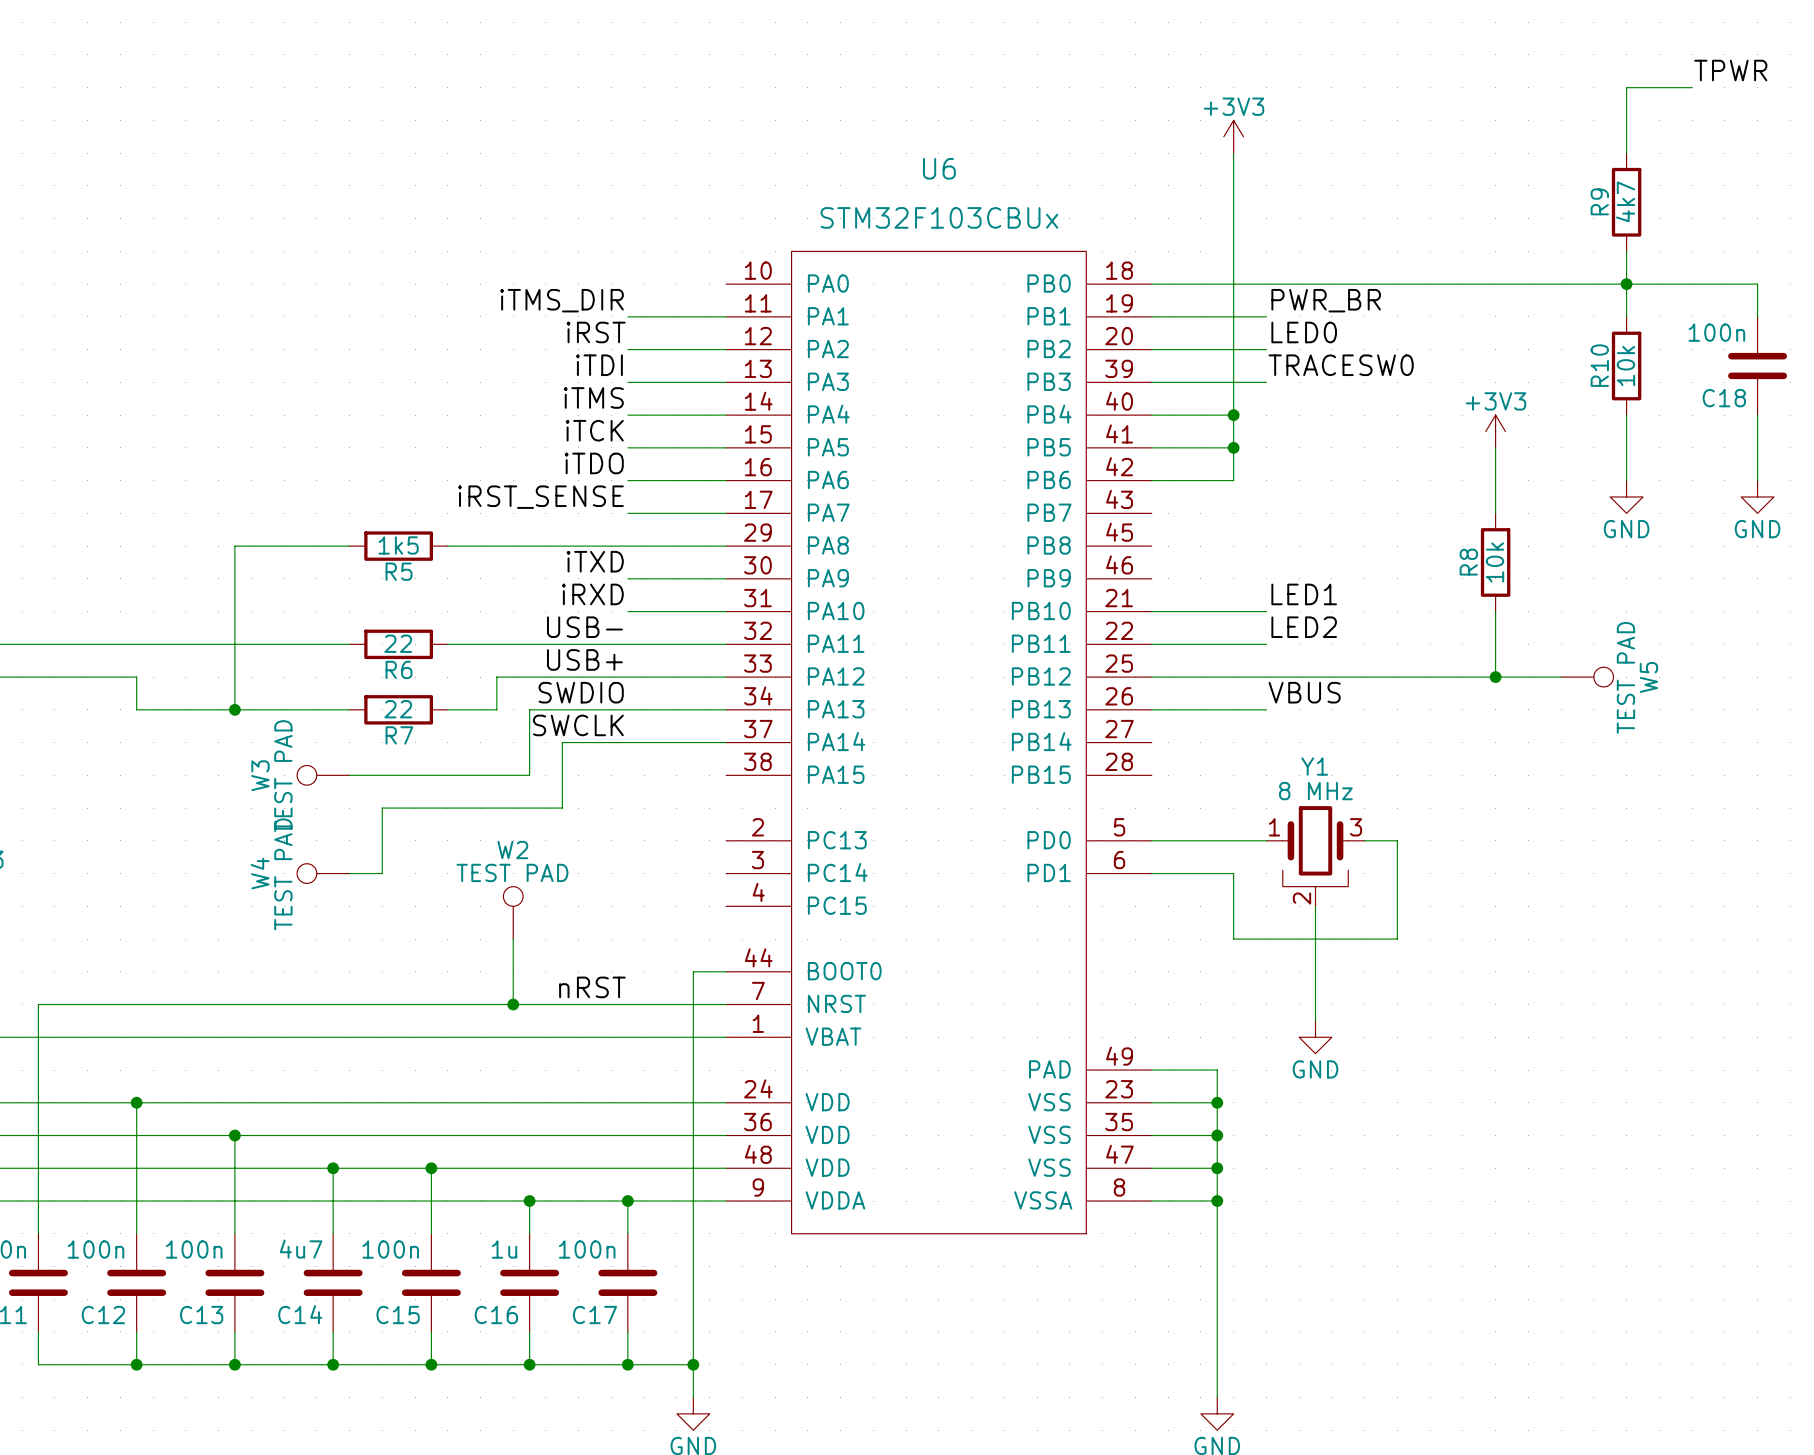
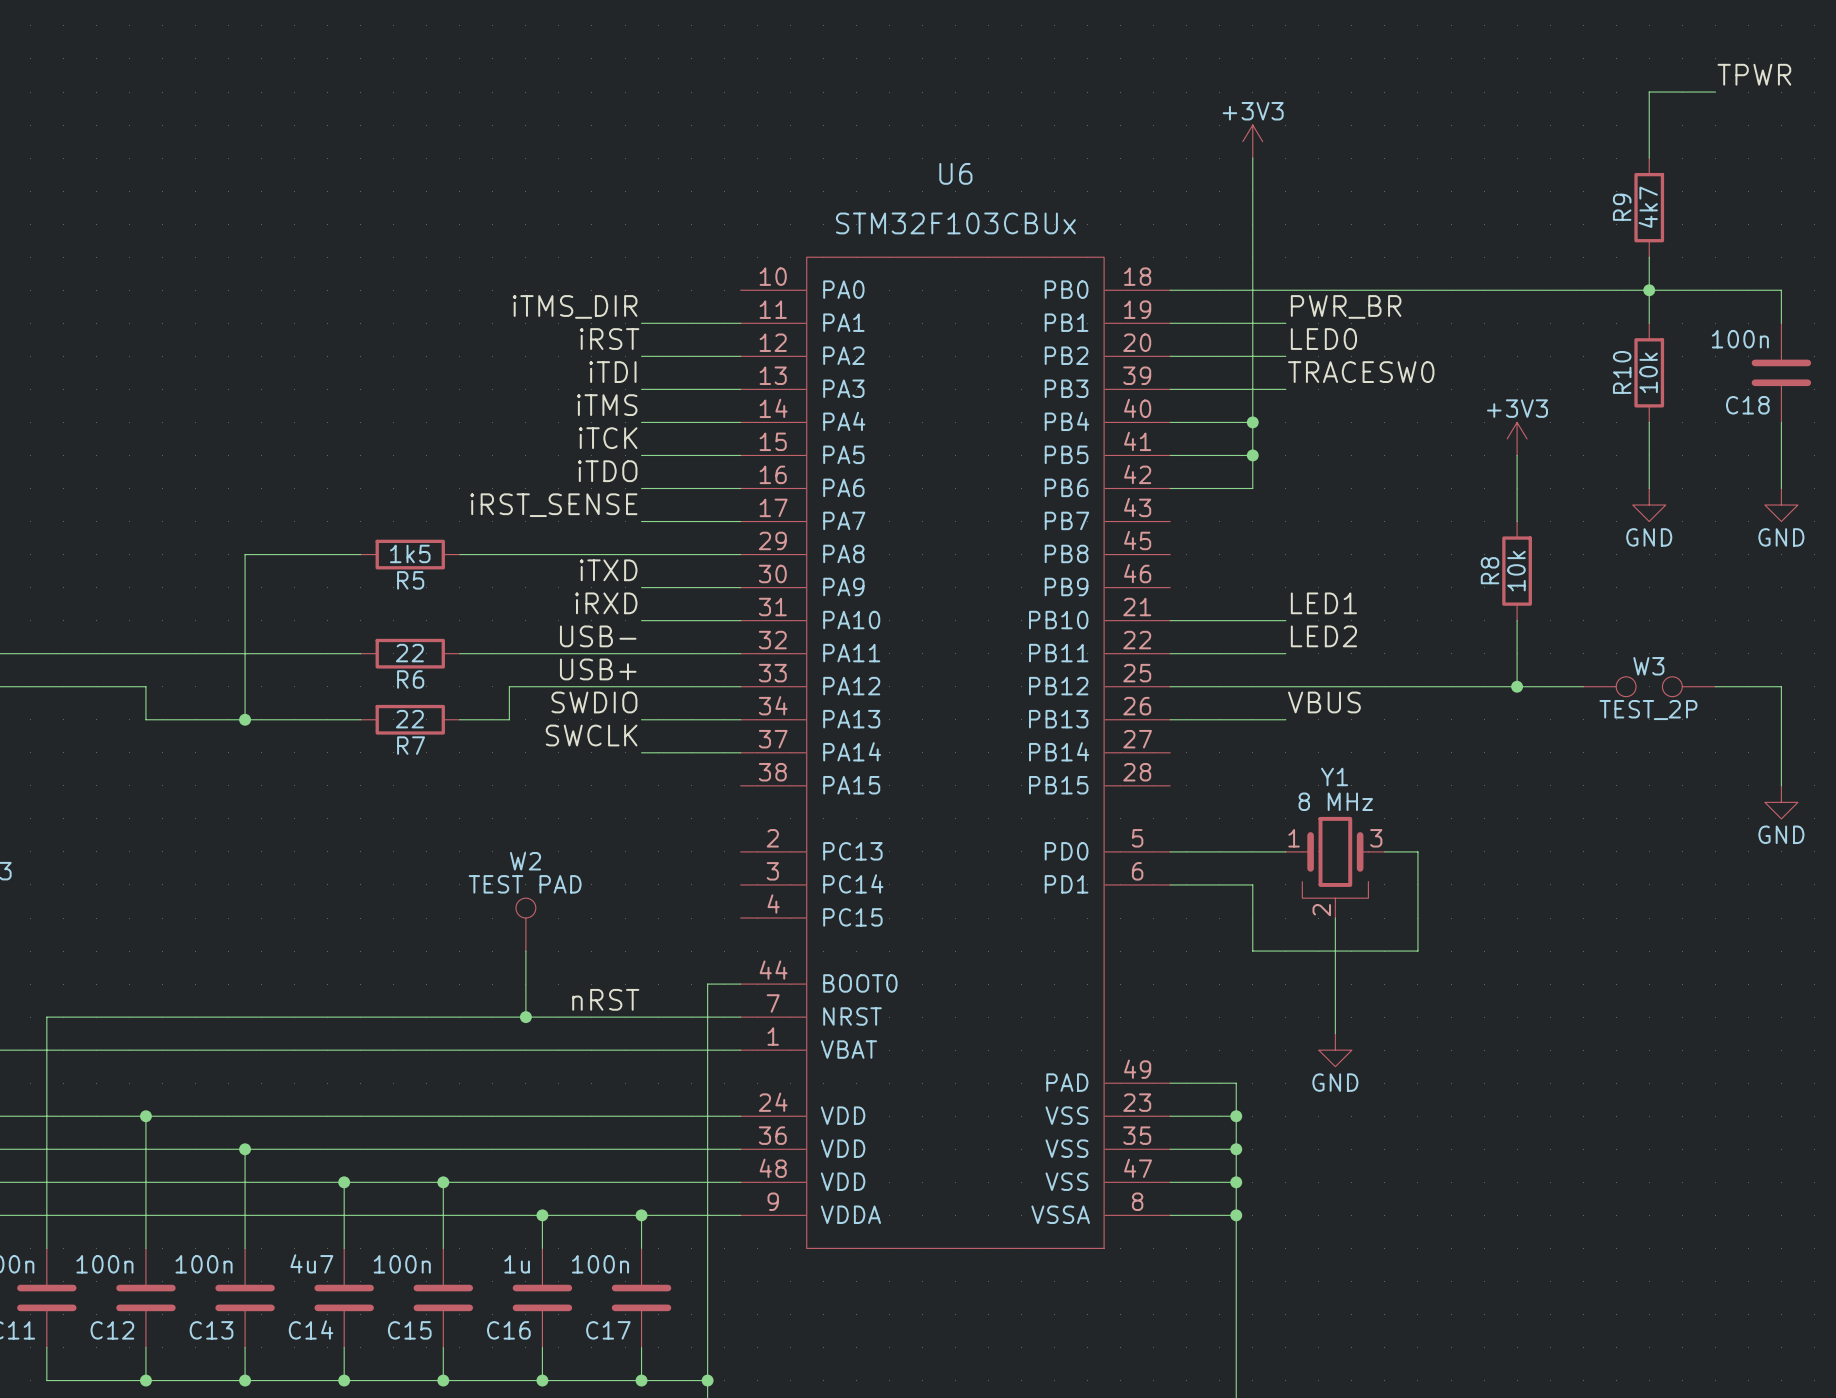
W5: TEST PAD (1587, 677) -> none
wire: none -> (1715, 686) (1781, 686) (1781, 785)
wire: (627, 709) (529, 709) (529, 775) (349, 775) -> none
wire: (627, 742) (562, 742) (562, 808) (382, 808) (382, 873) (349, 873) -> none
W3 symbol: [297, 765, 350, 786] -> [1583, 676, 1716, 697]
W3 name position: W3 (260, 775) -> W3 (1648, 666)
W3 value: TEST PAD (283, 776) -> TEST_2P (1648, 710)
power symbol: none -> GND (1781, 802)
W4: TEST PAD (323, 873) -> none

